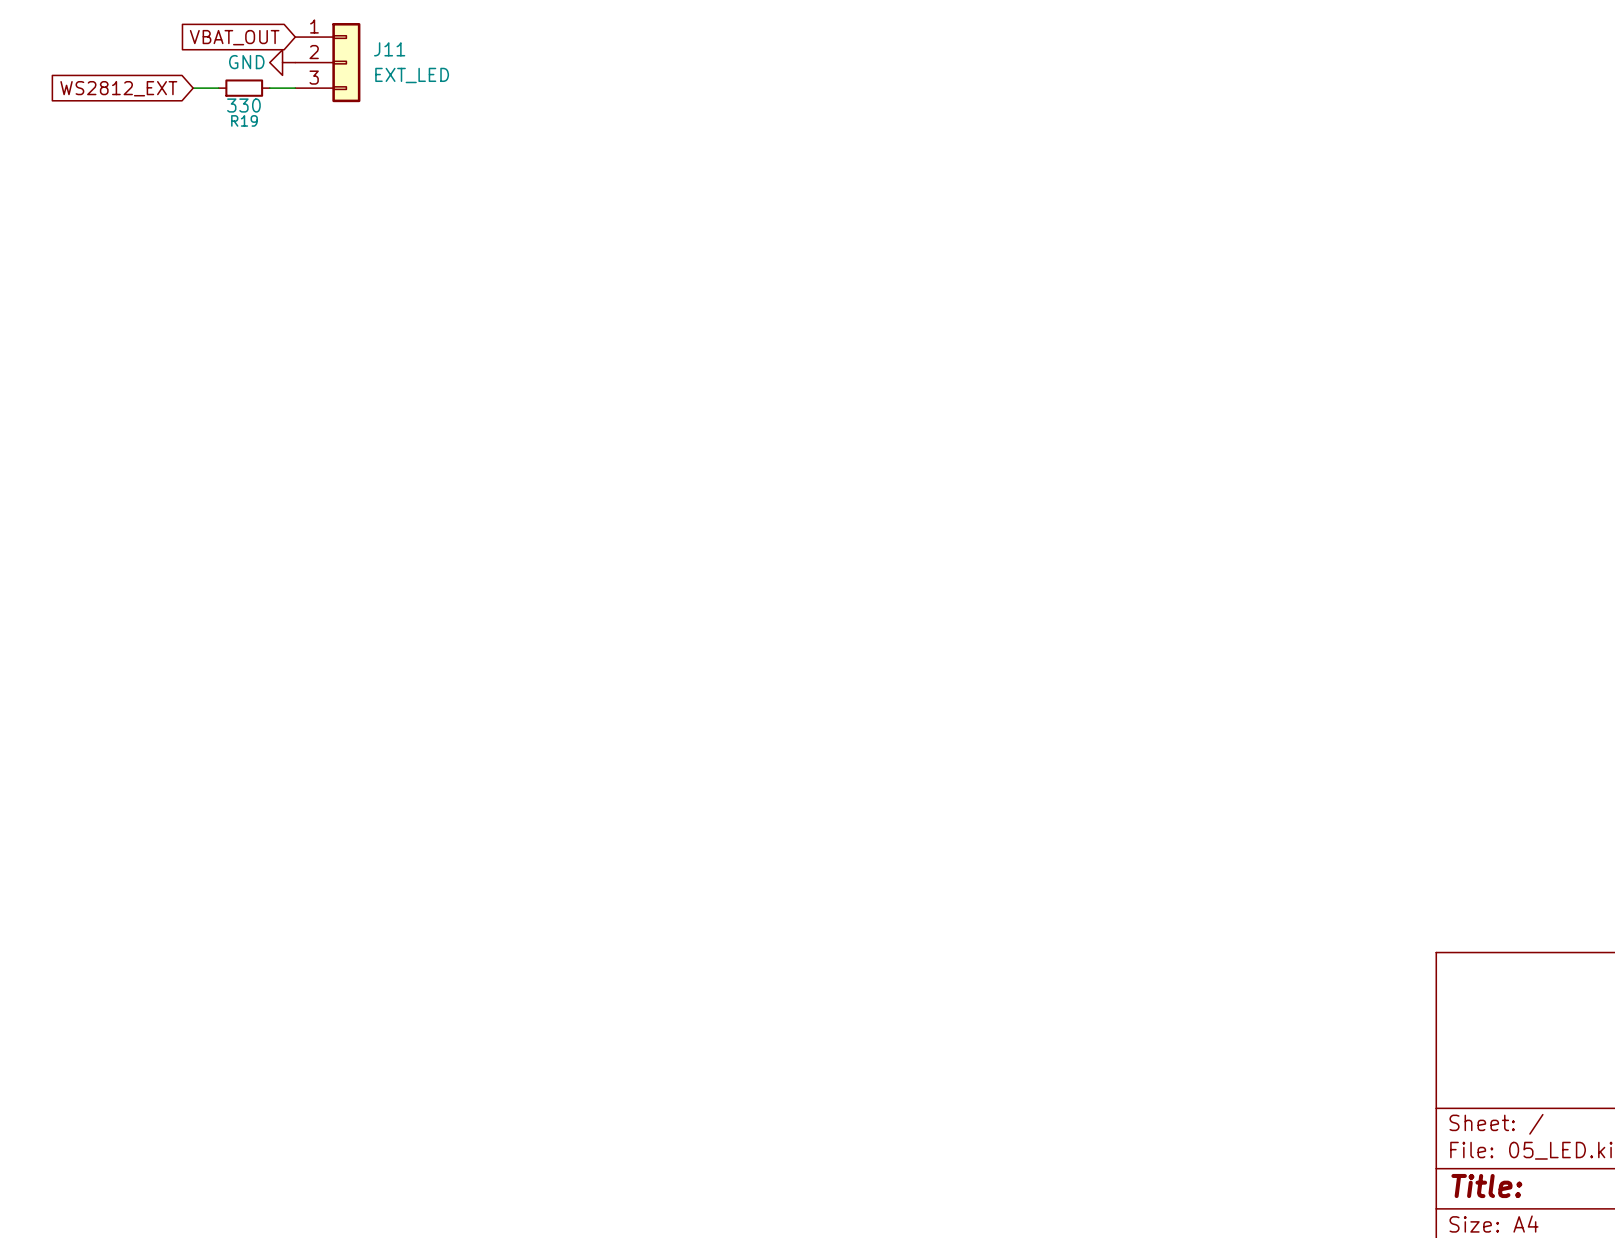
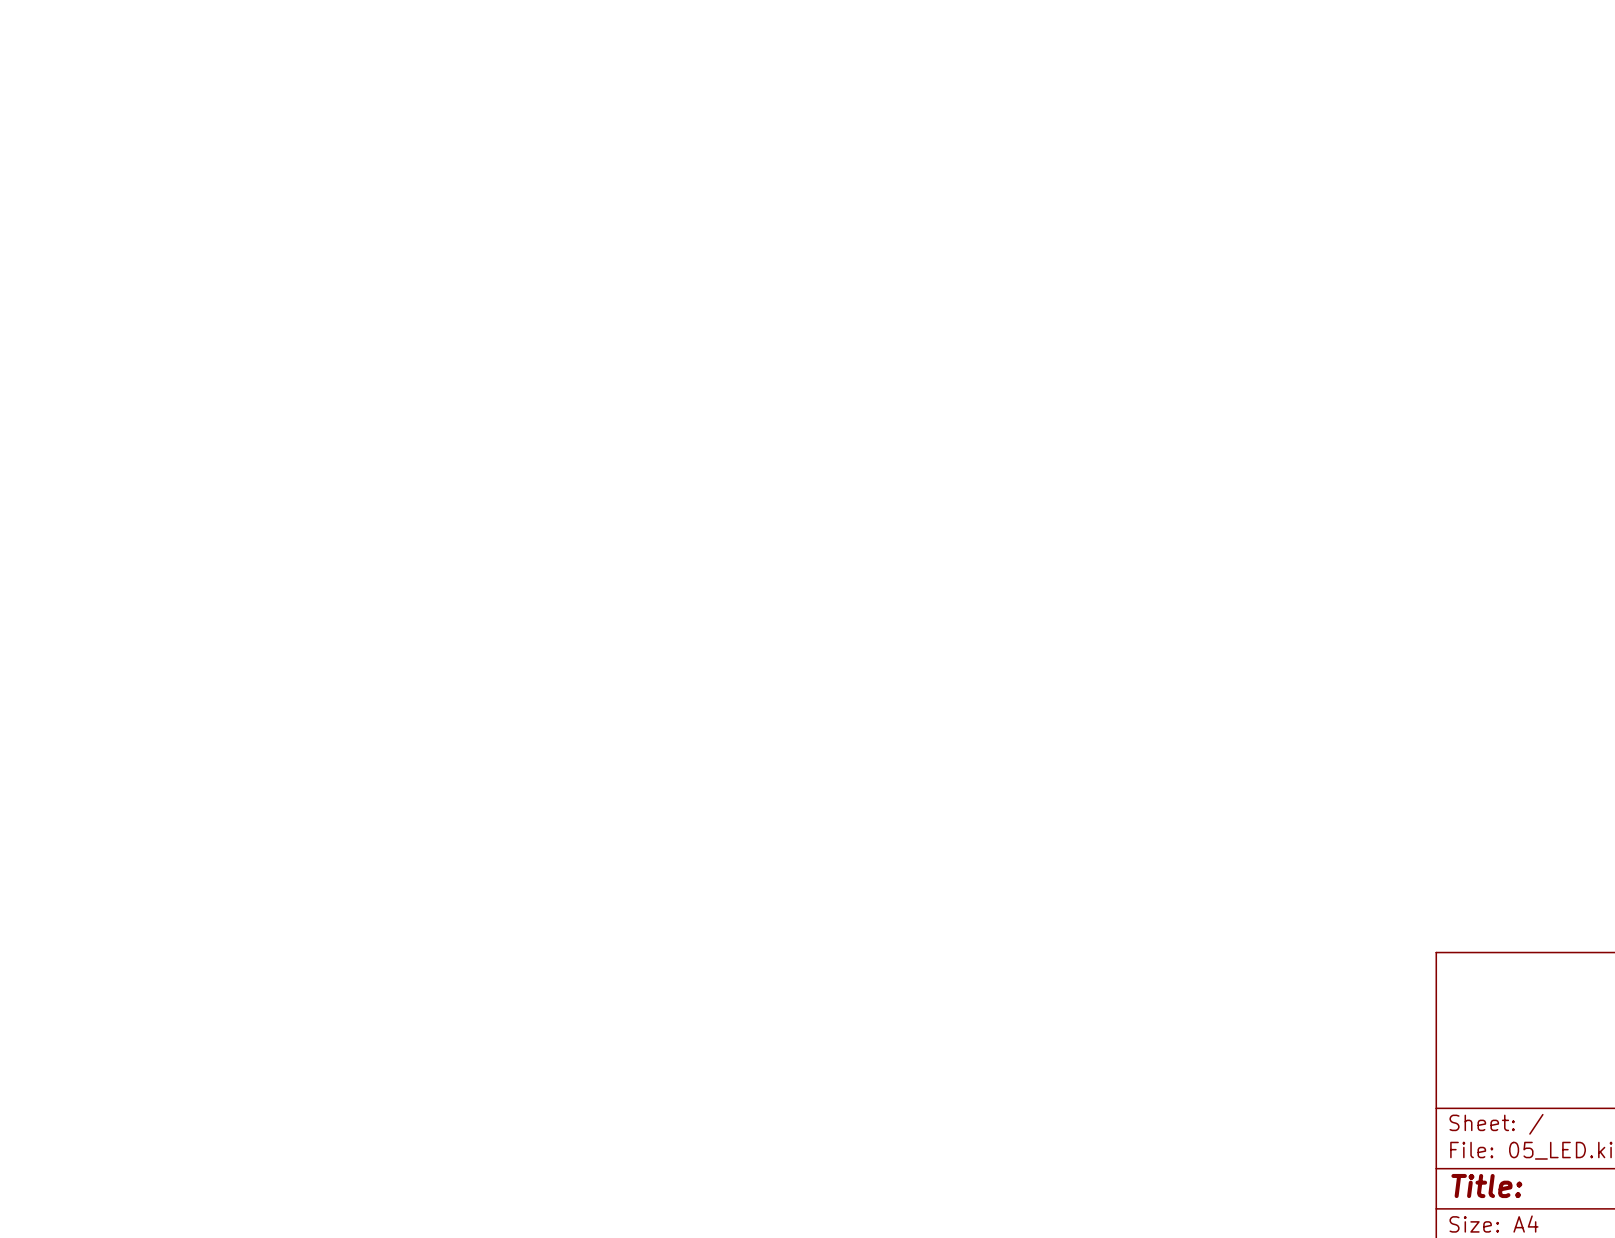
global label: VBAT_OUT (234, 37) -> none
power symbol: GND (282, 62) -> none
J11: EXT_LED (327, 62) -> none
global label: WS2812_EXT (118, 88) -> none
wire: (193, 88) (218, 88) -> none
R19: 330 (244, 88) -> none
wire: (269, 88) (295, 88) -> none

